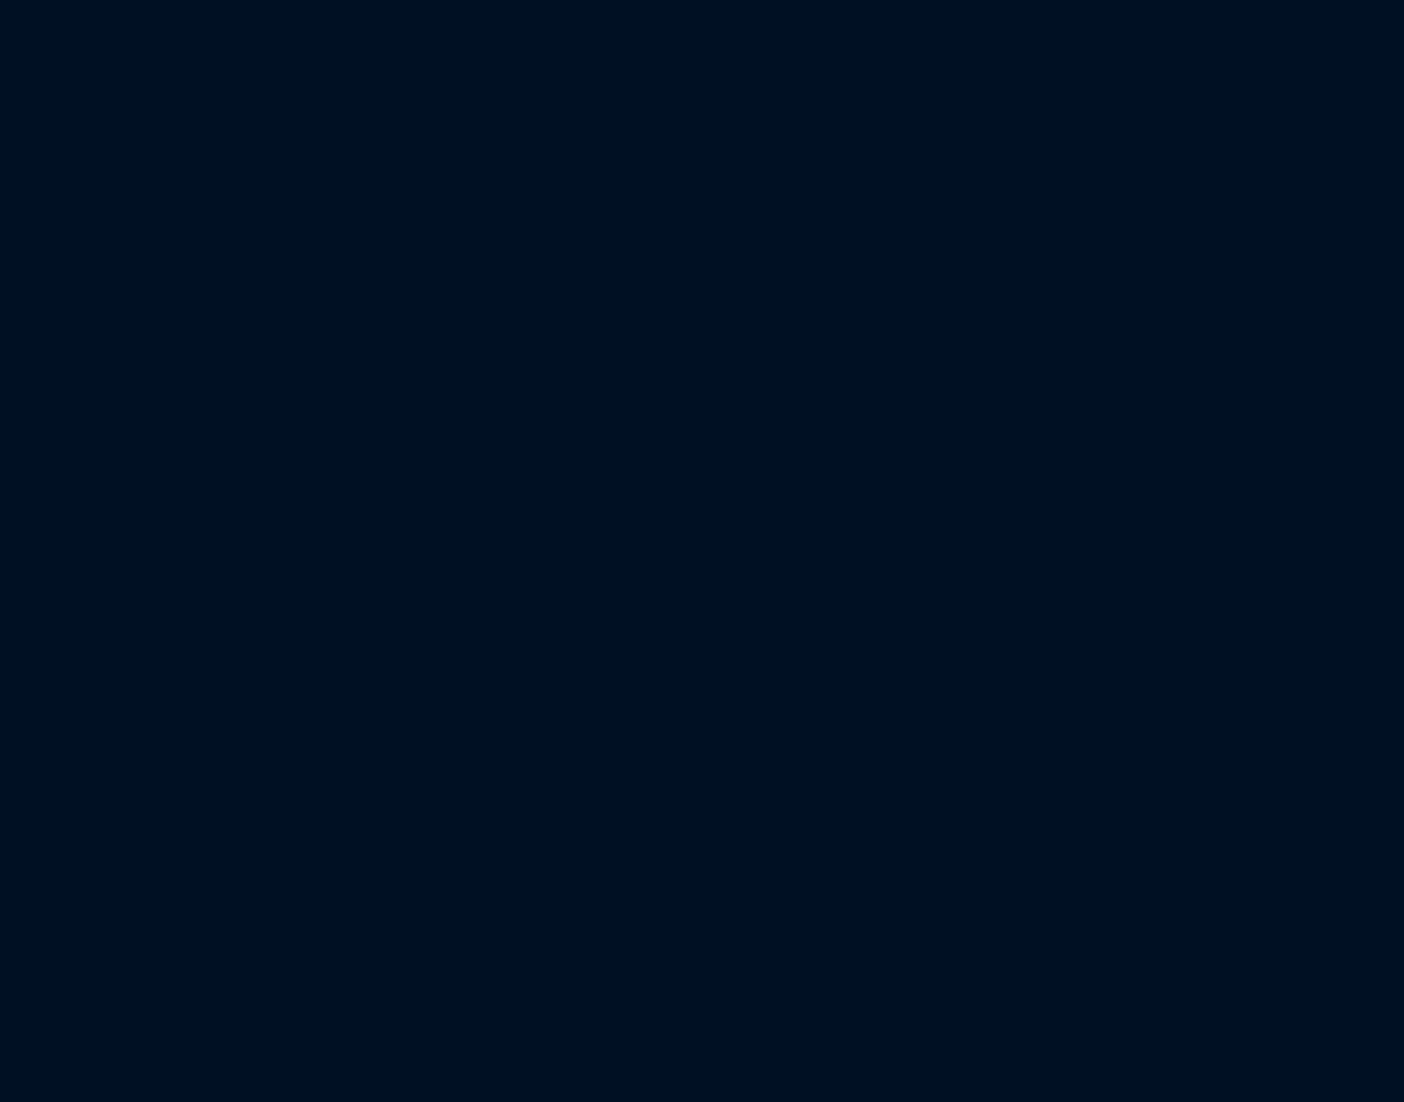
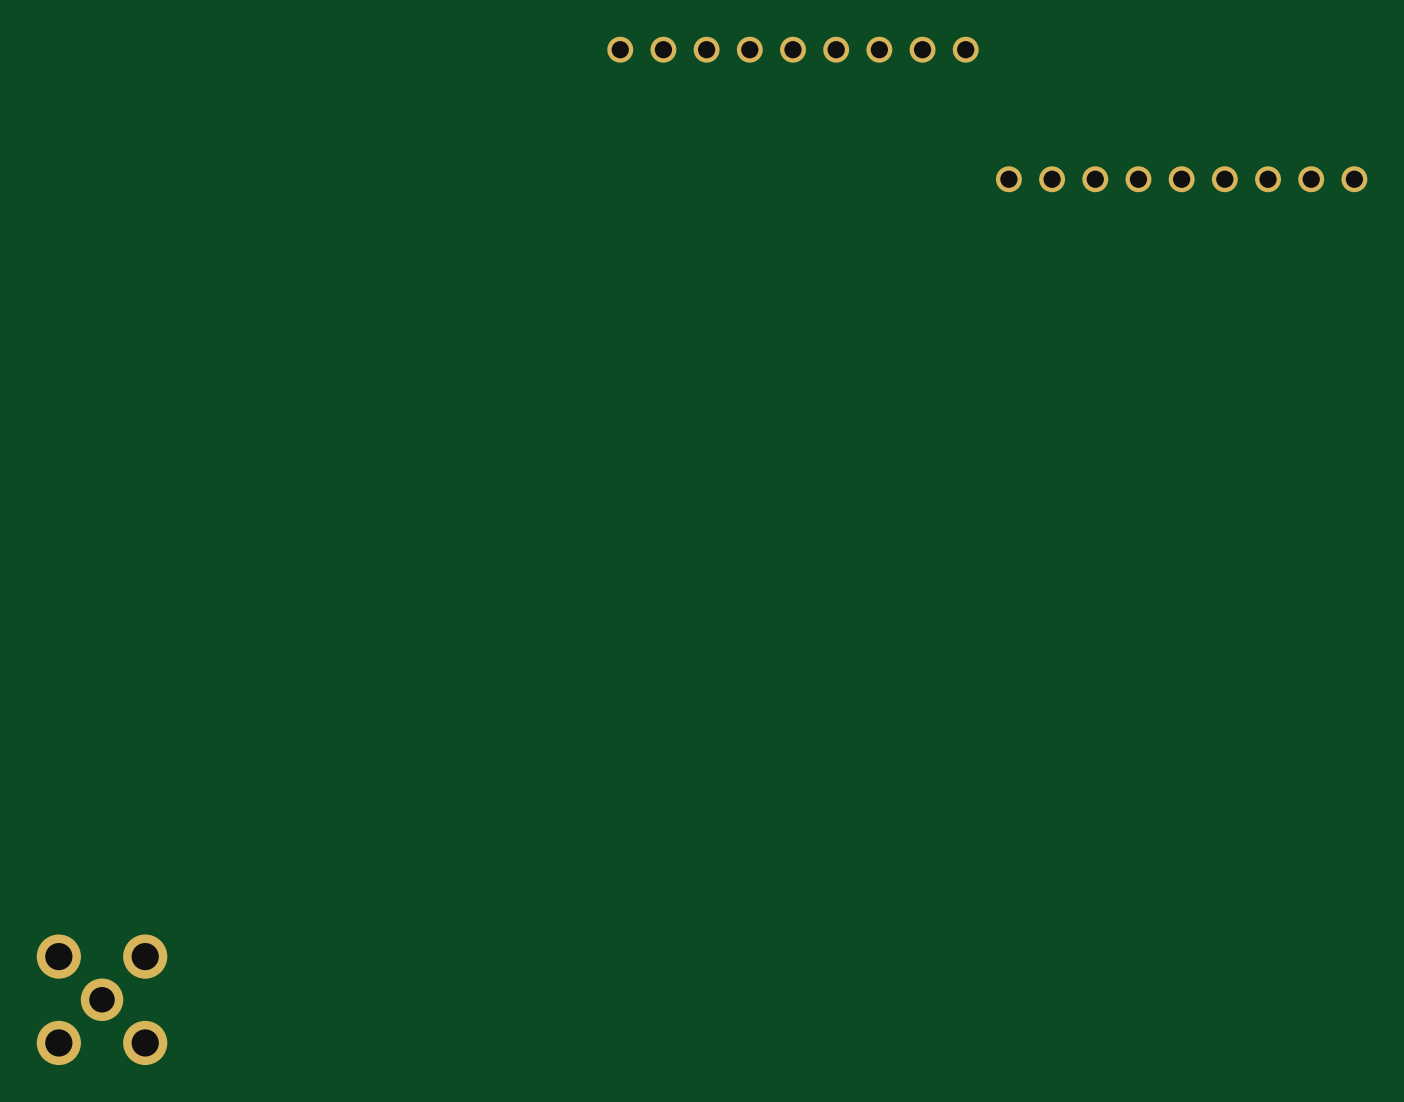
part: none -> (792, 49)
part: none -> (1181, 179)
part: none -> (102, 999)

